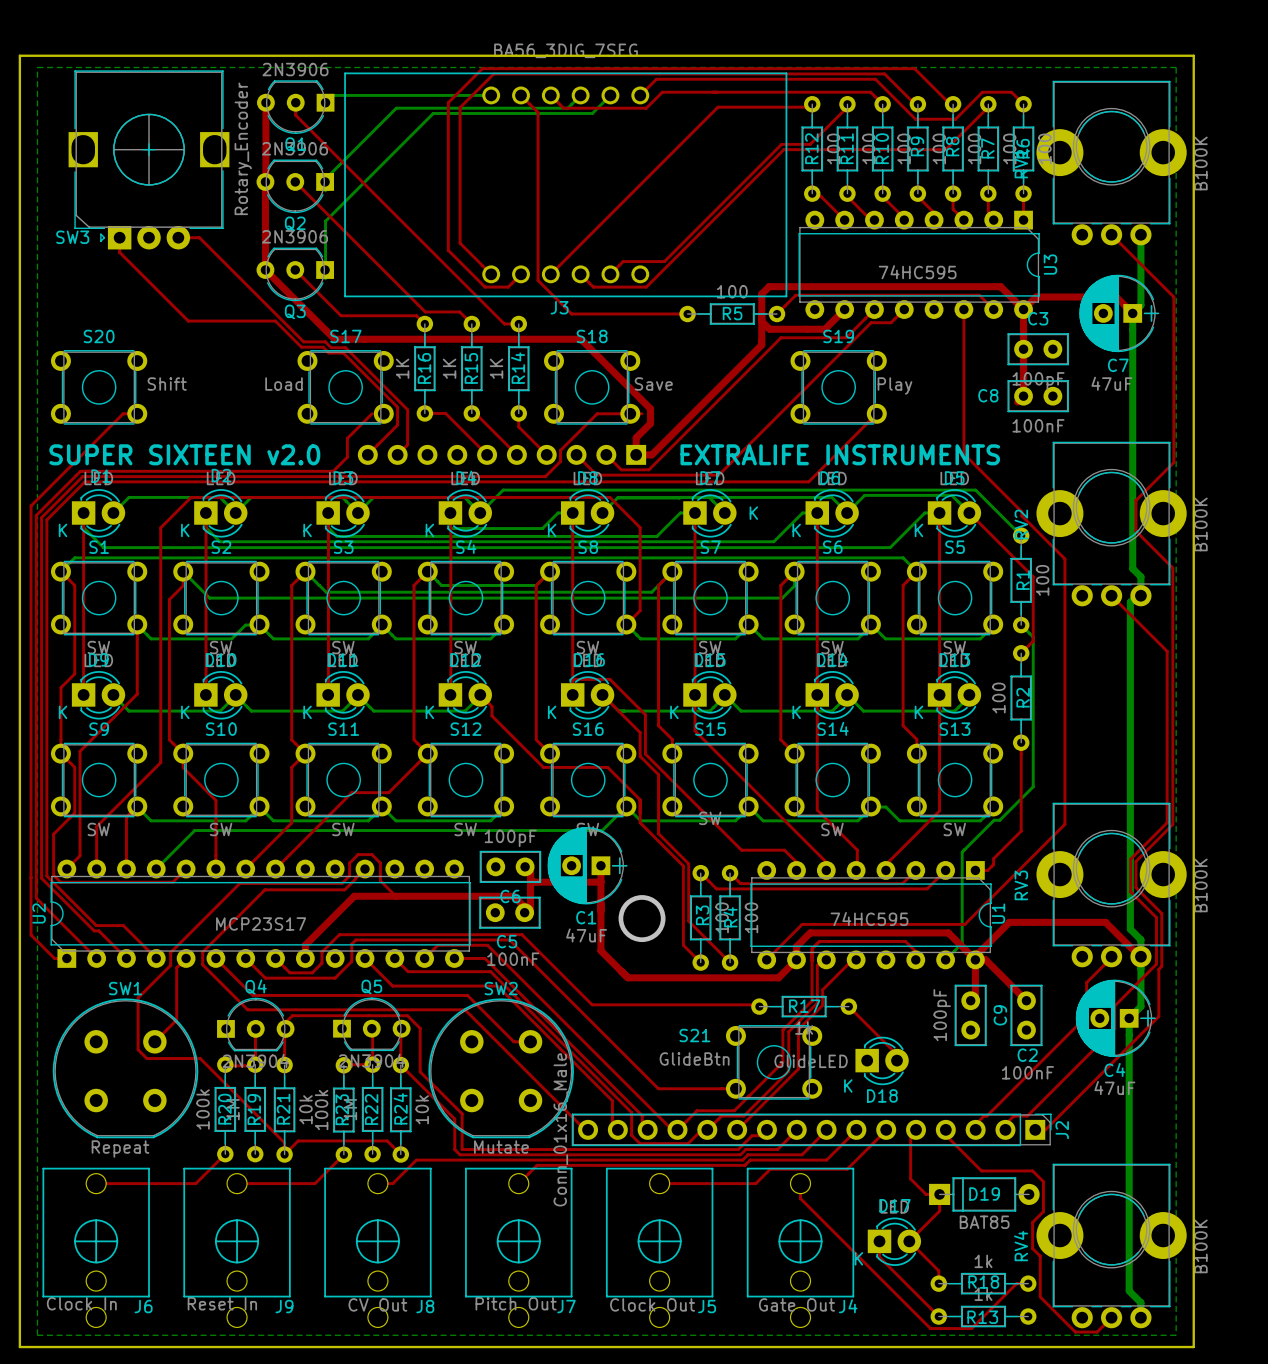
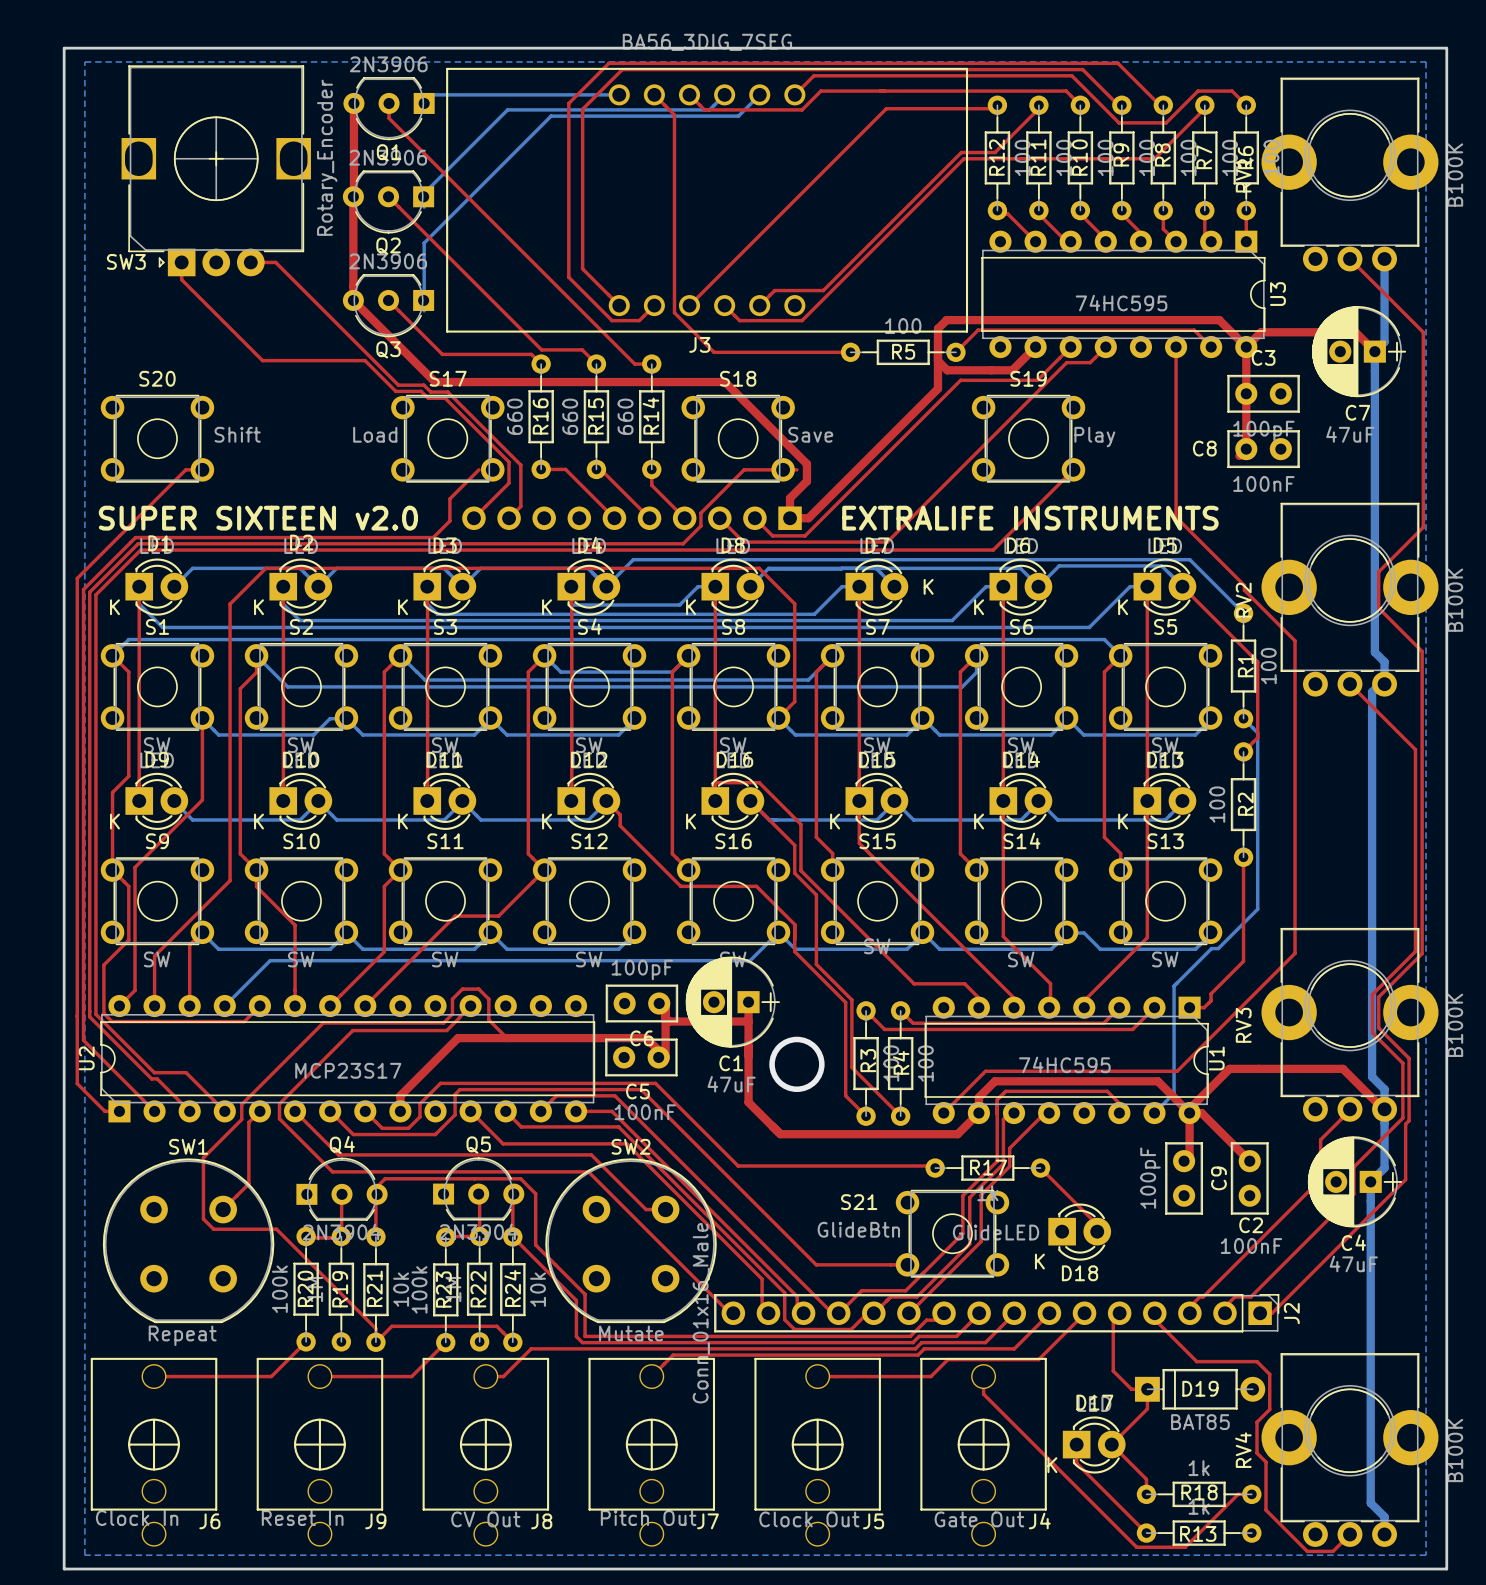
R16 value: 1K (402, 368) -> 660 (514, 416)
R15 value: 1K (449, 368) -> 660 (570, 416)
R14 value: 1K (496, 368) -> 660 (625, 416)

